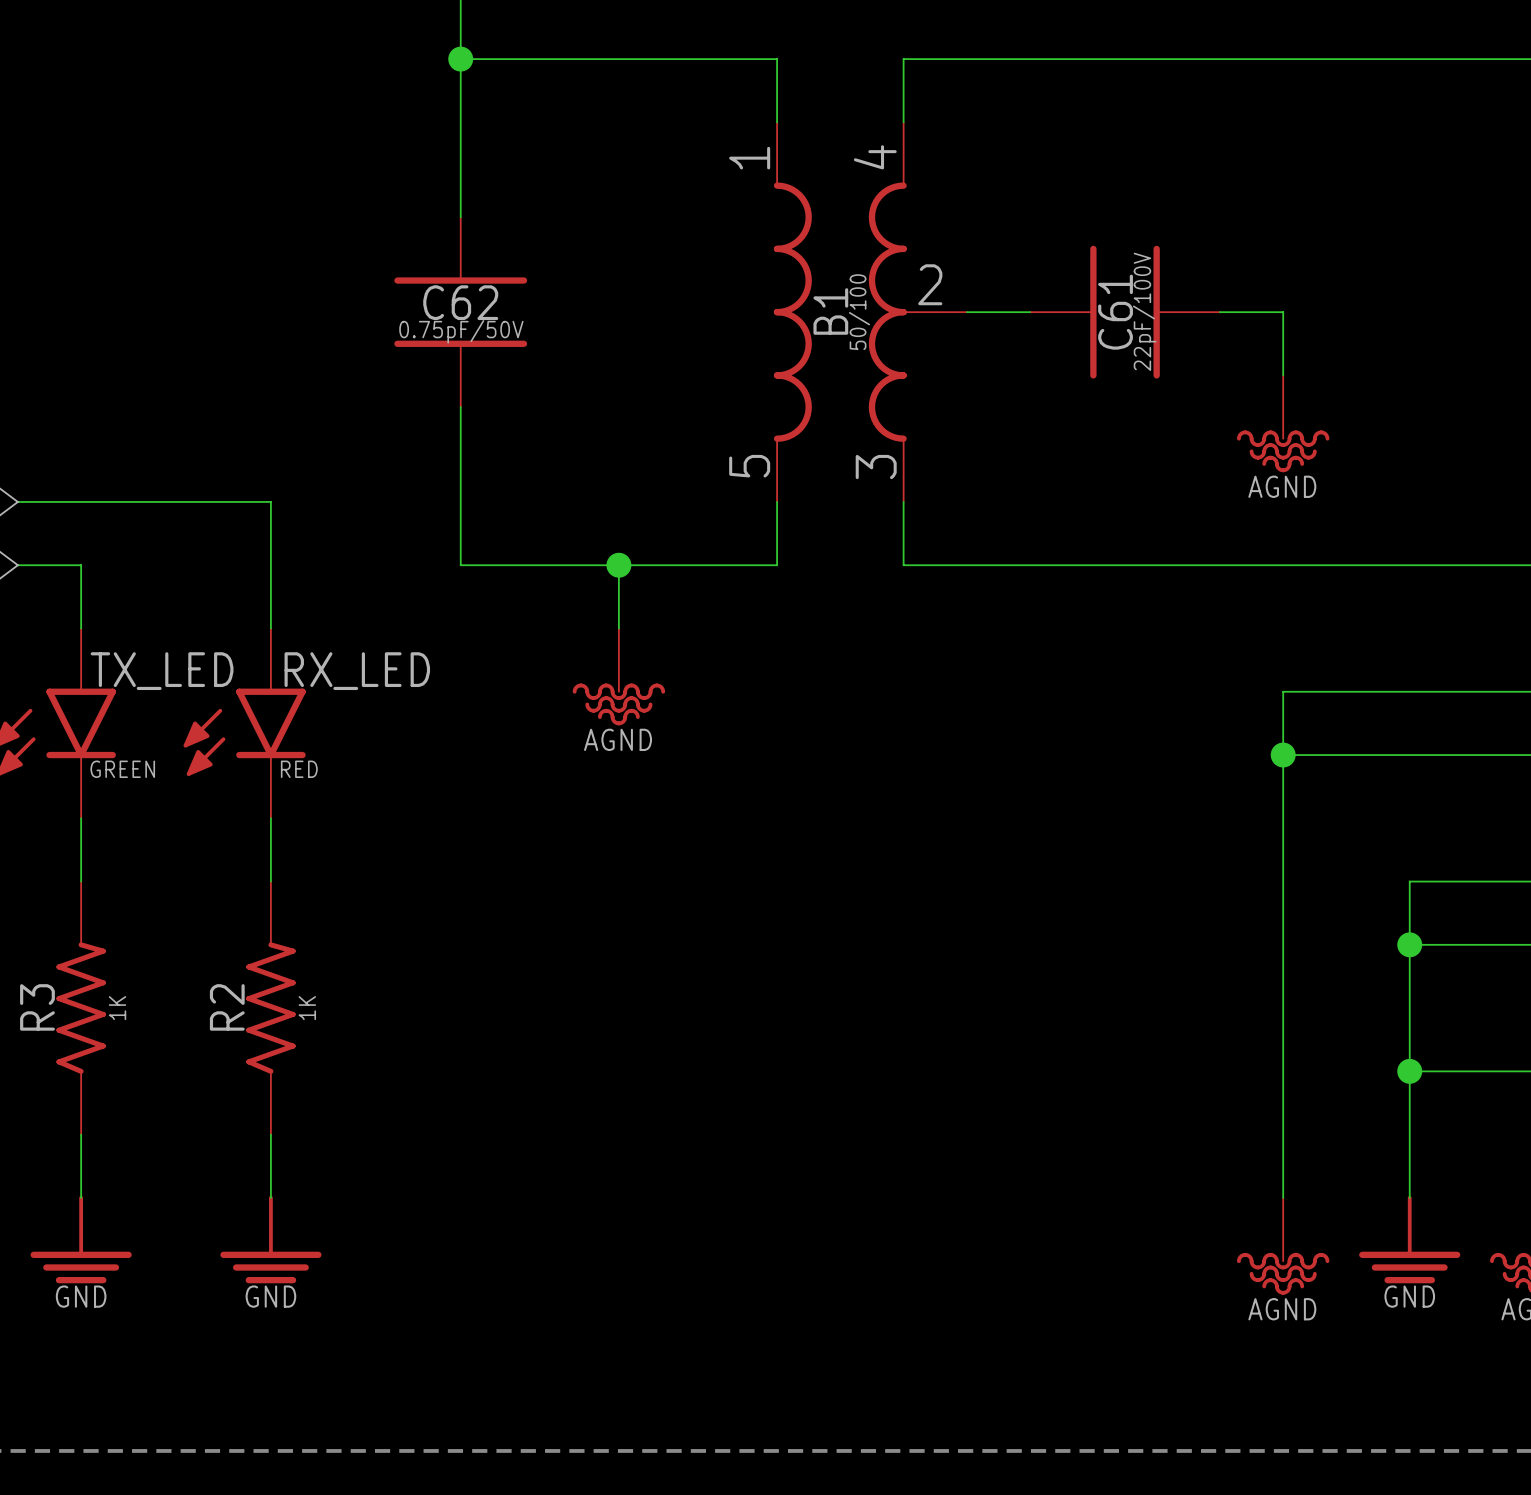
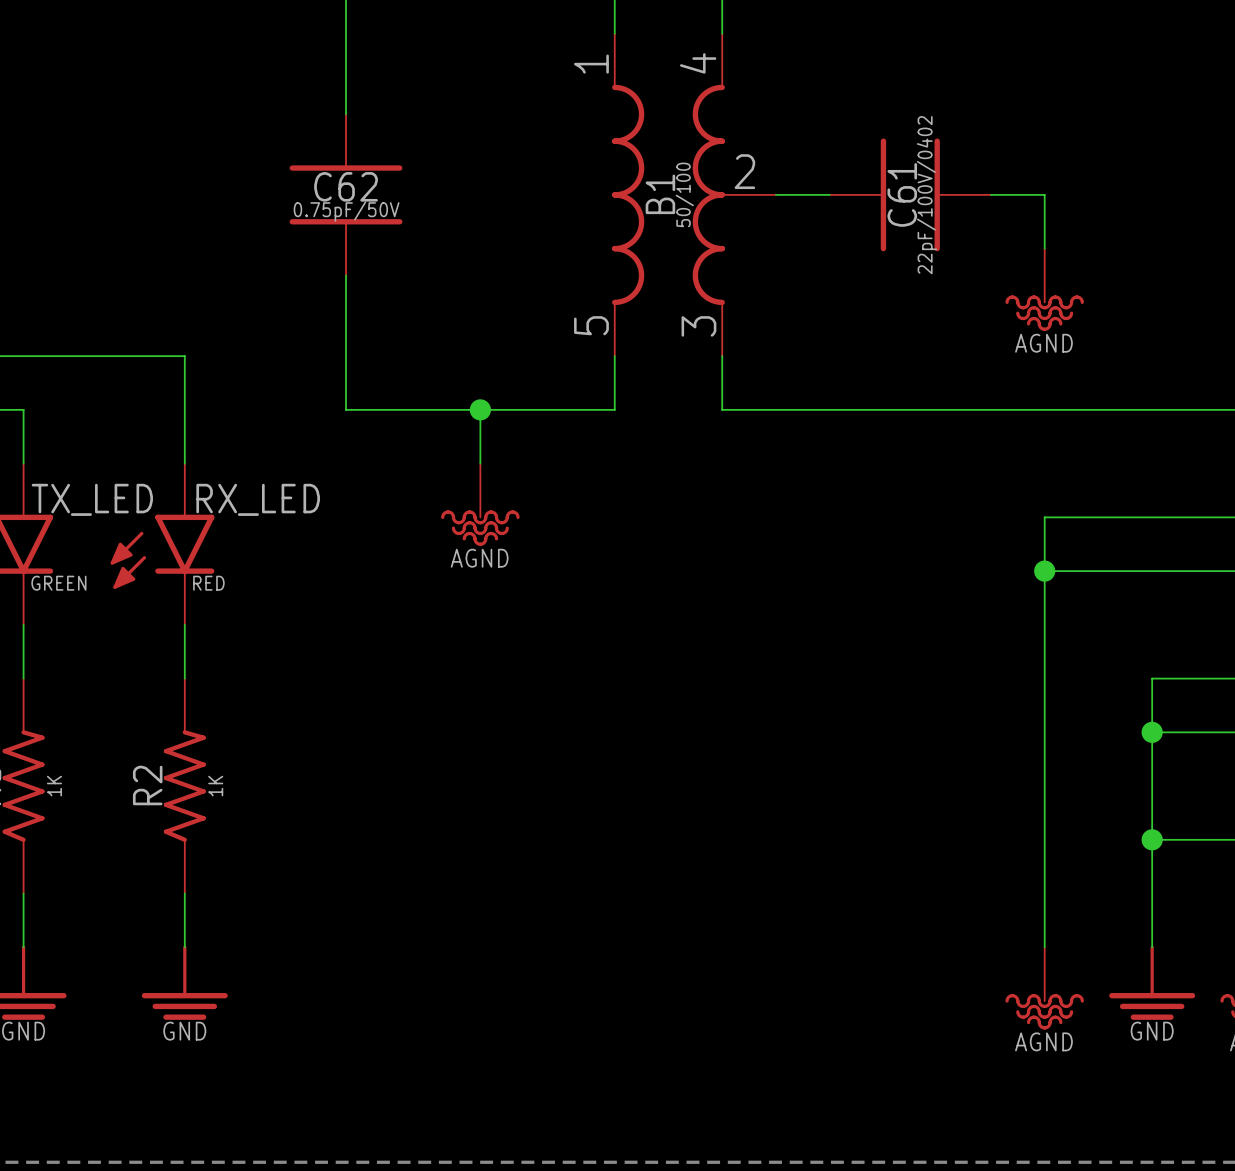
C61 value: 22pF/100V (1144, 311) -> 22pF/100V/0402 (927, 195)

